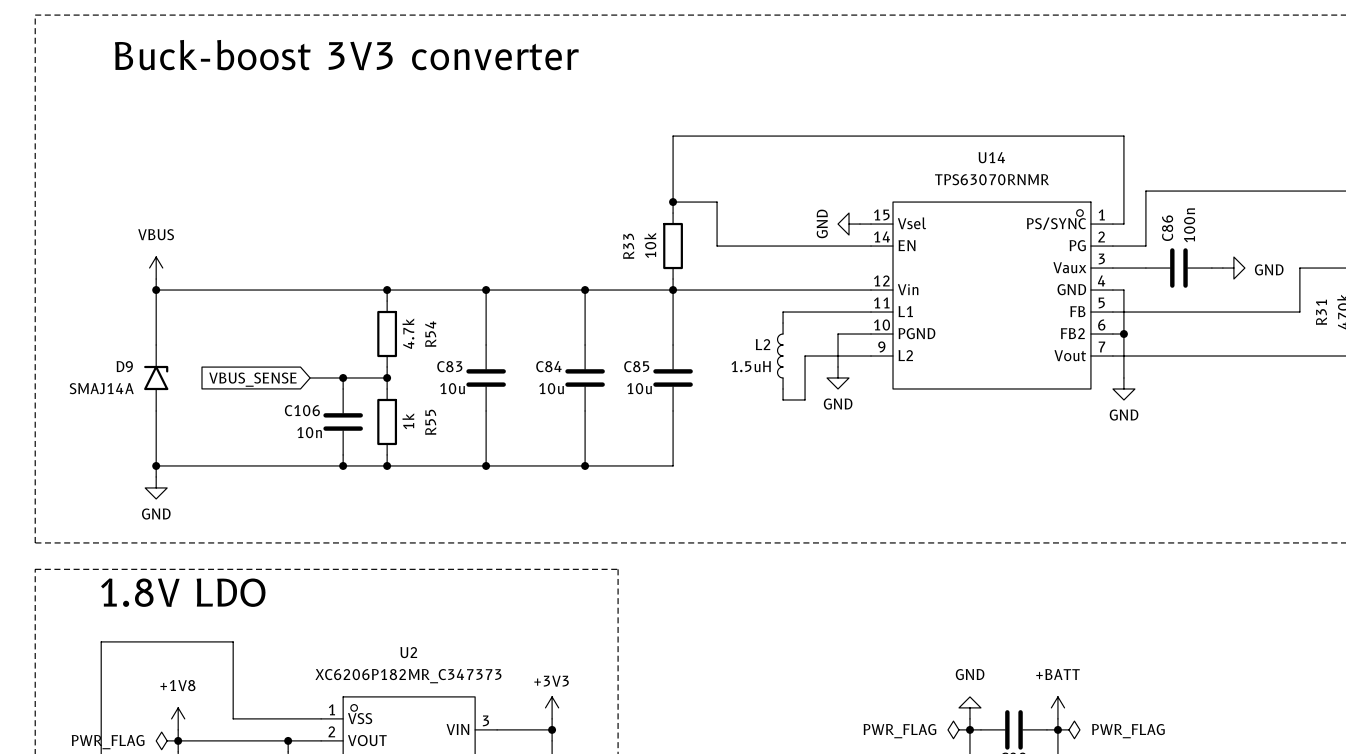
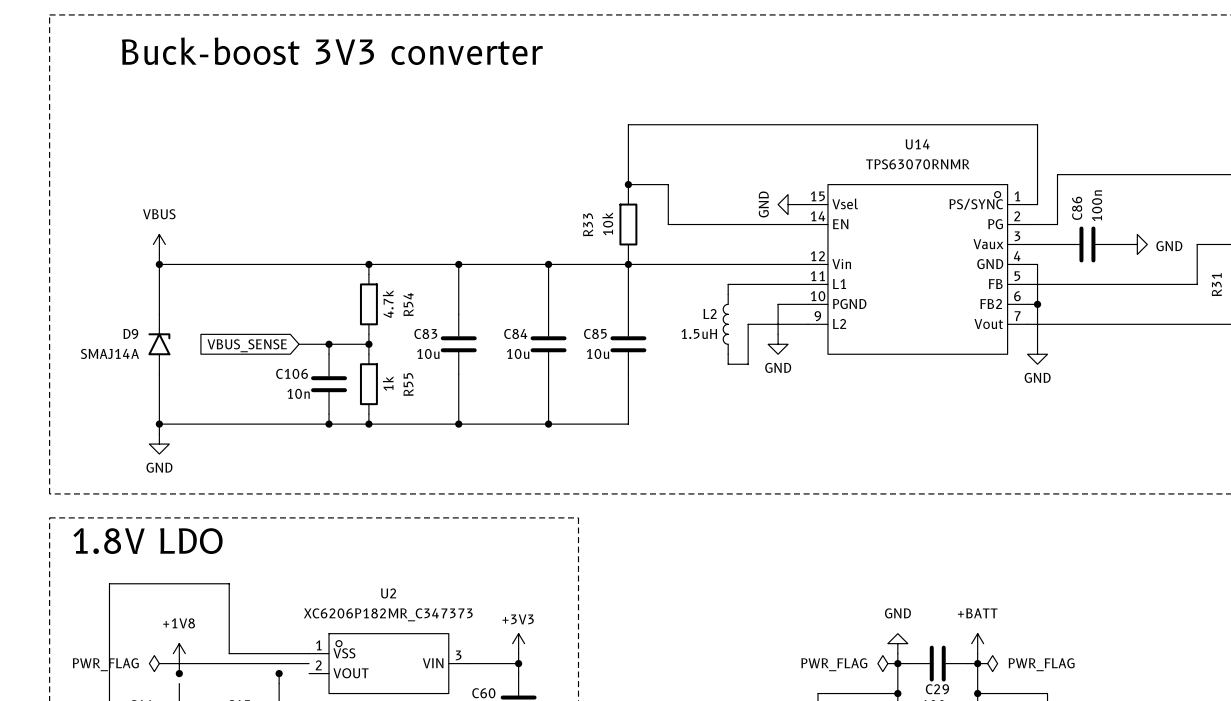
text position: 1.8V LDO (183, 592) -> 1.8V LDO (148, 541)
wire: none -> (169, 663) (309, 663)
power symbol position: PWR_FLAG (167, 740) -> PWR_FLAG (159, 663)
wire: (321, 740) (178, 740) (178, 751) -> none

